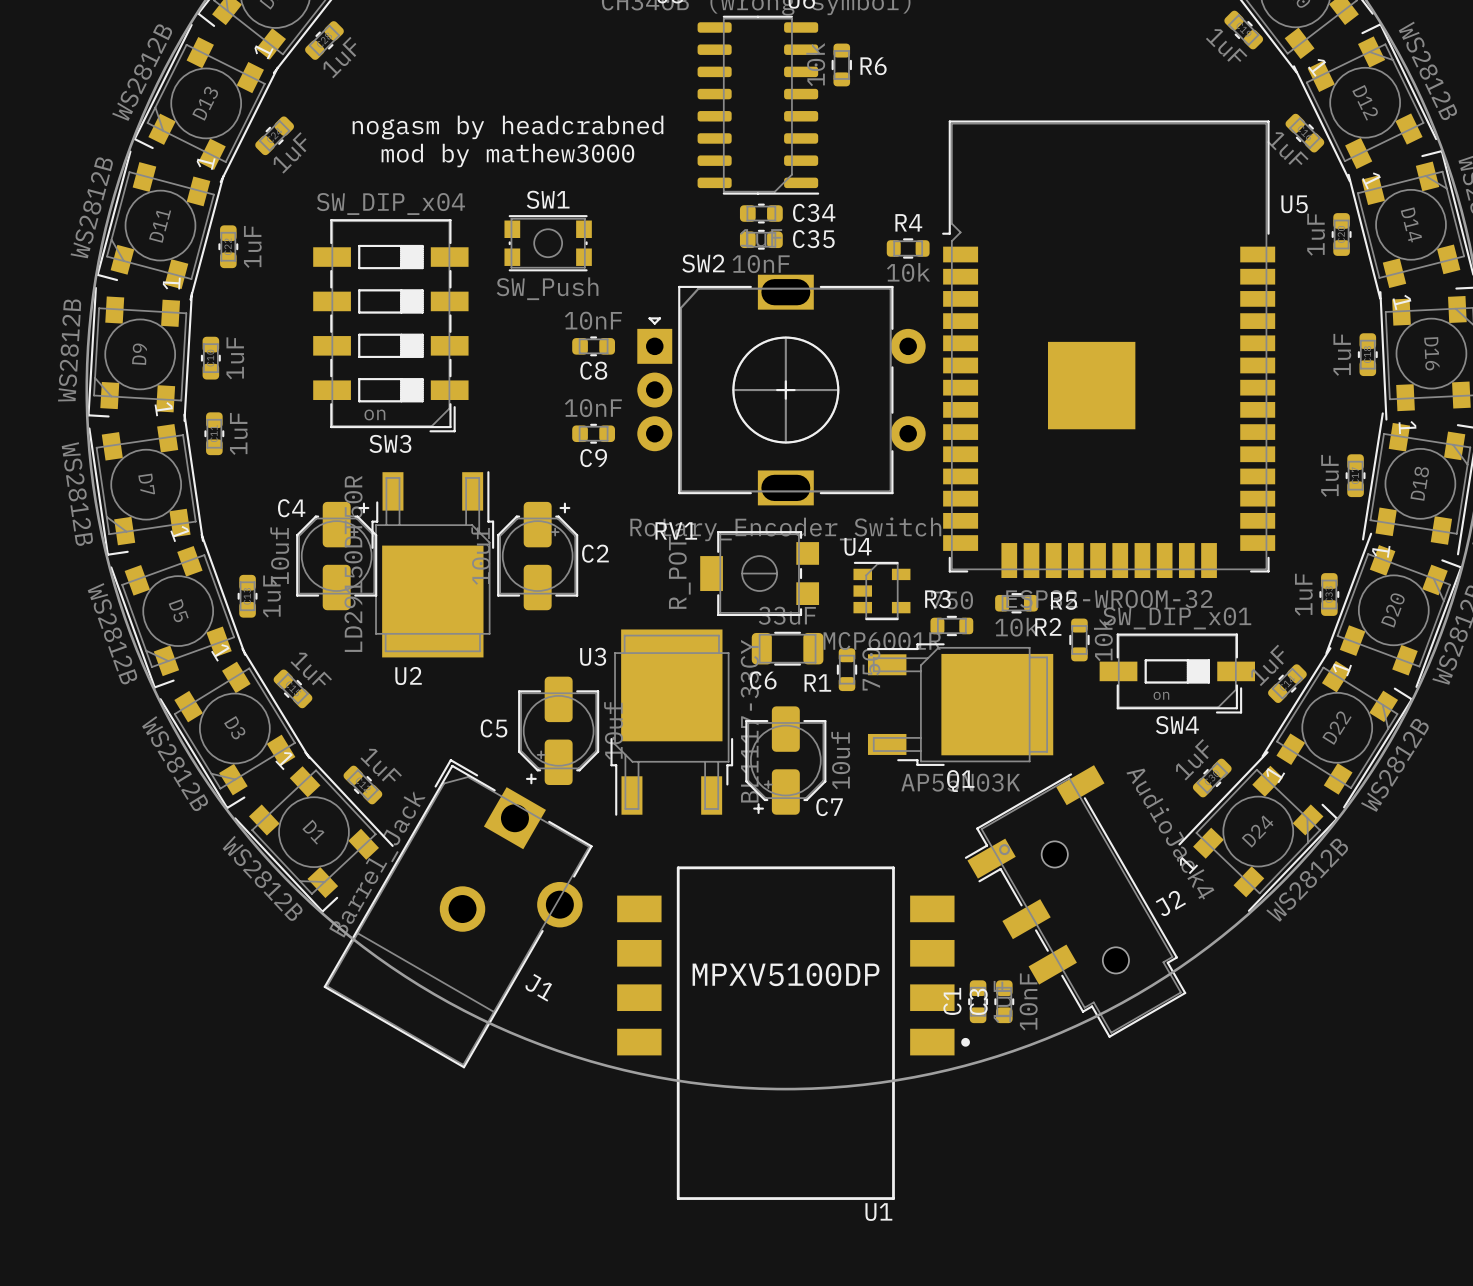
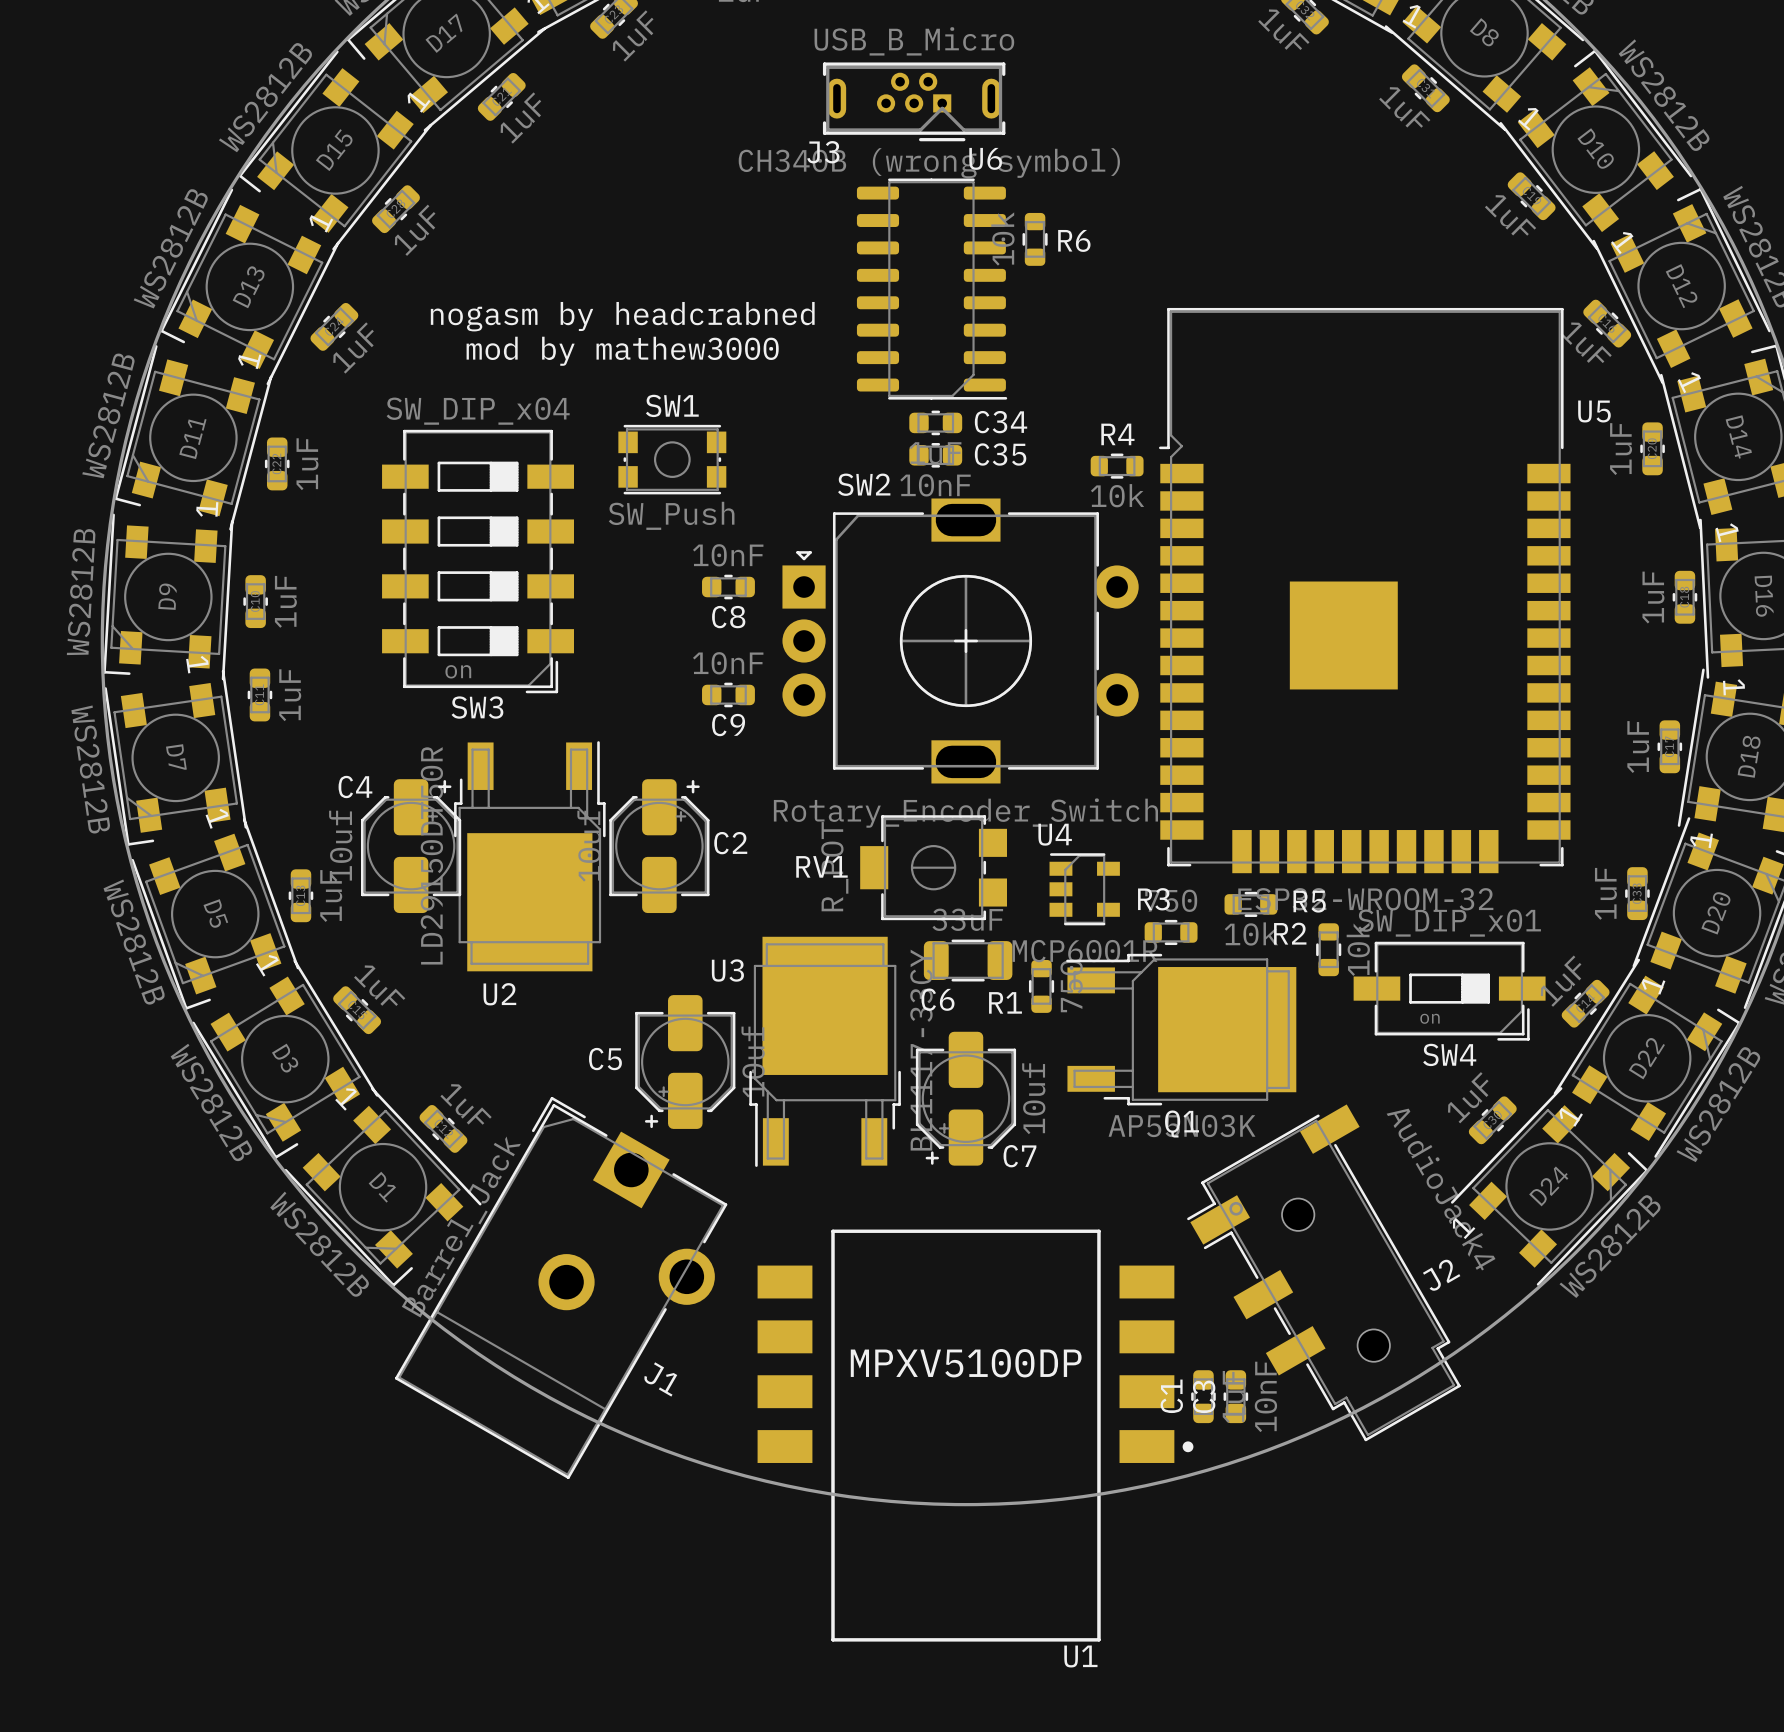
RV1 name position: RV1 (676, 530) -> RV1 (821, 866)

